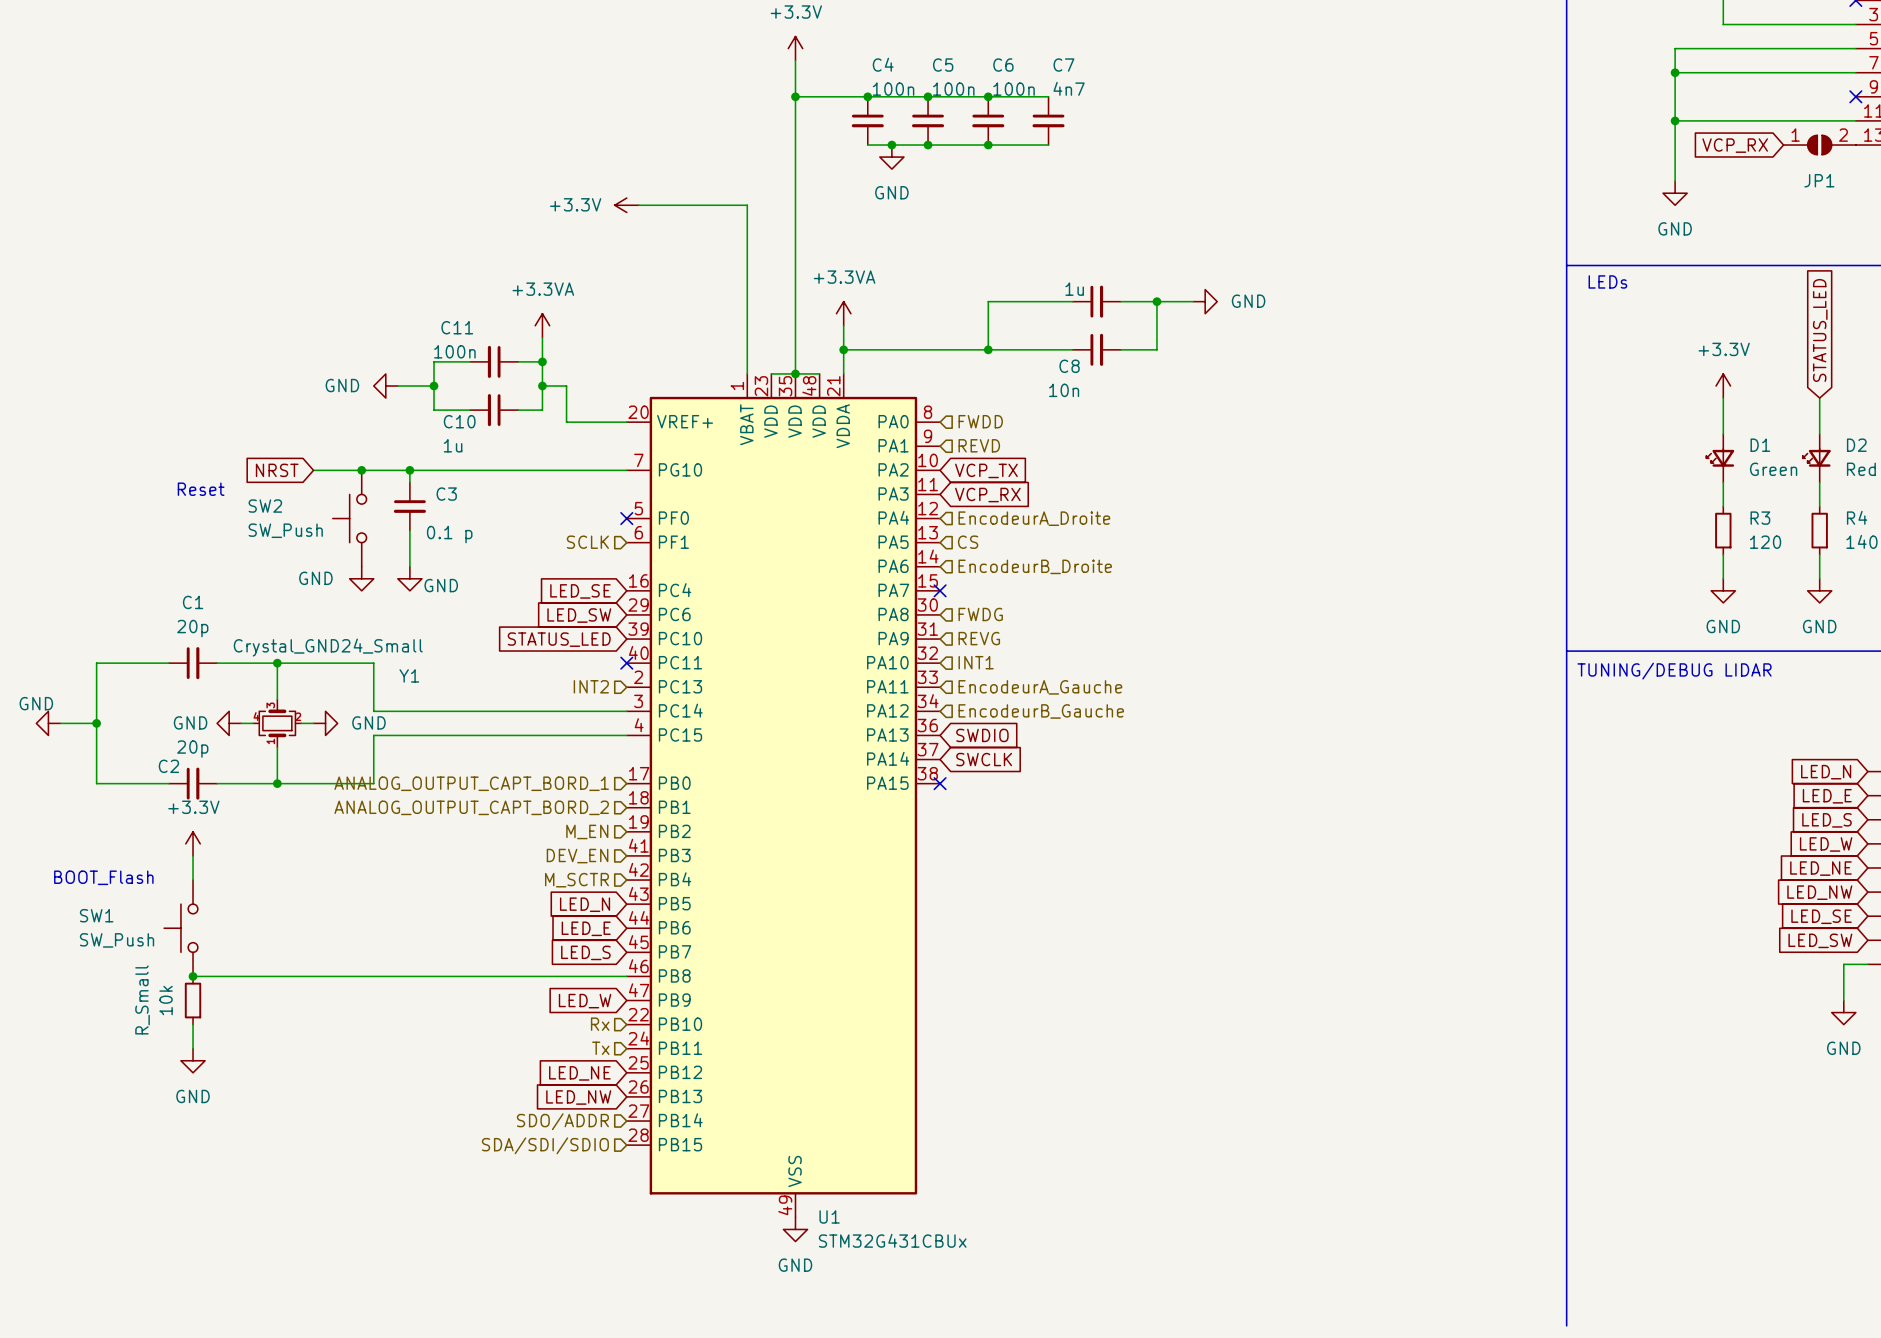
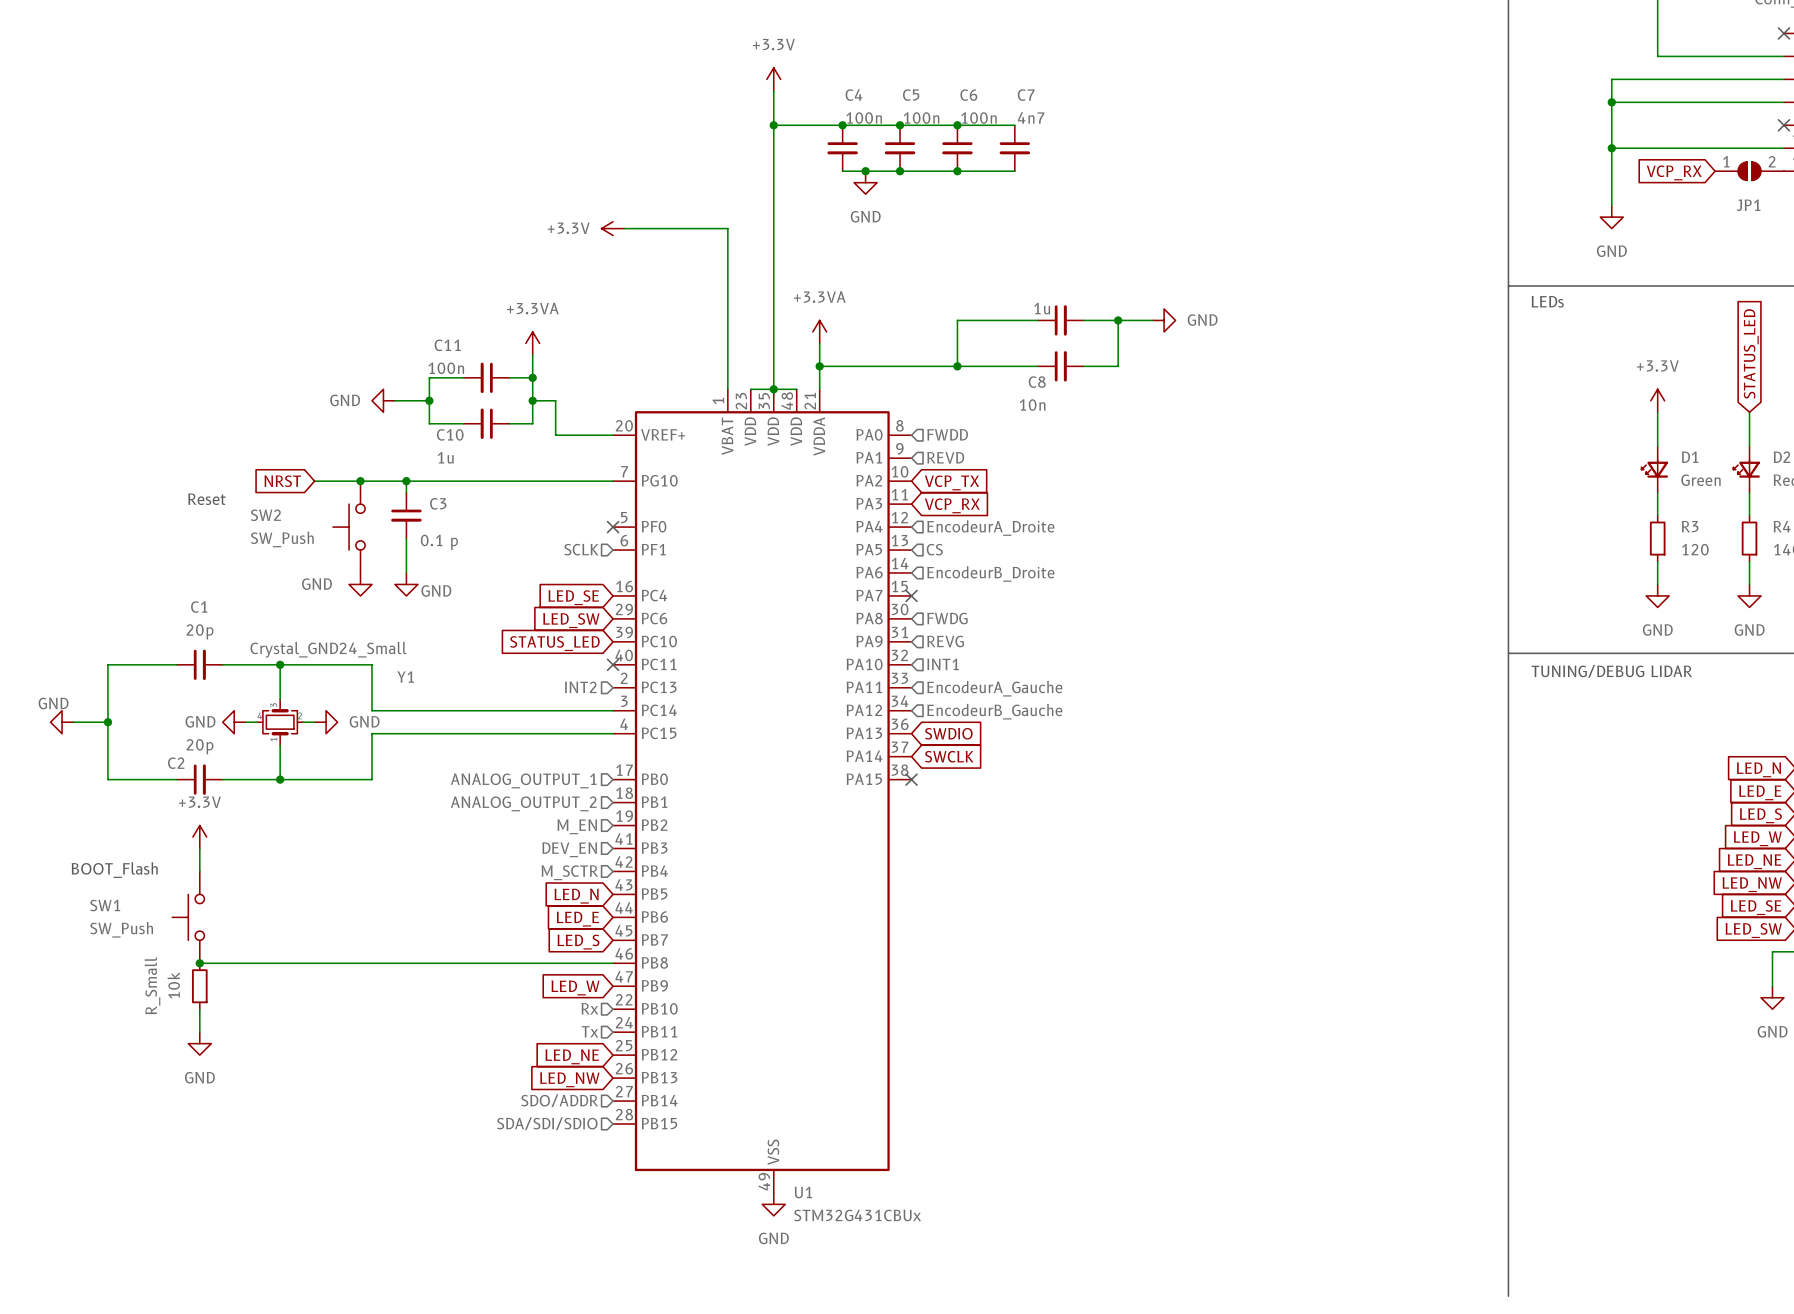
hierarchical label: ANALOG_OUTPUT_CAPT_BORD_1 (471, 783) -> ANALOG_OUTPUT_1 (523, 780)
hierarchical label: ANALOG_OUTPUT_CAPT_BORD_2 (471, 807) -> ANALOG_OUTPUT_2 (523, 803)

